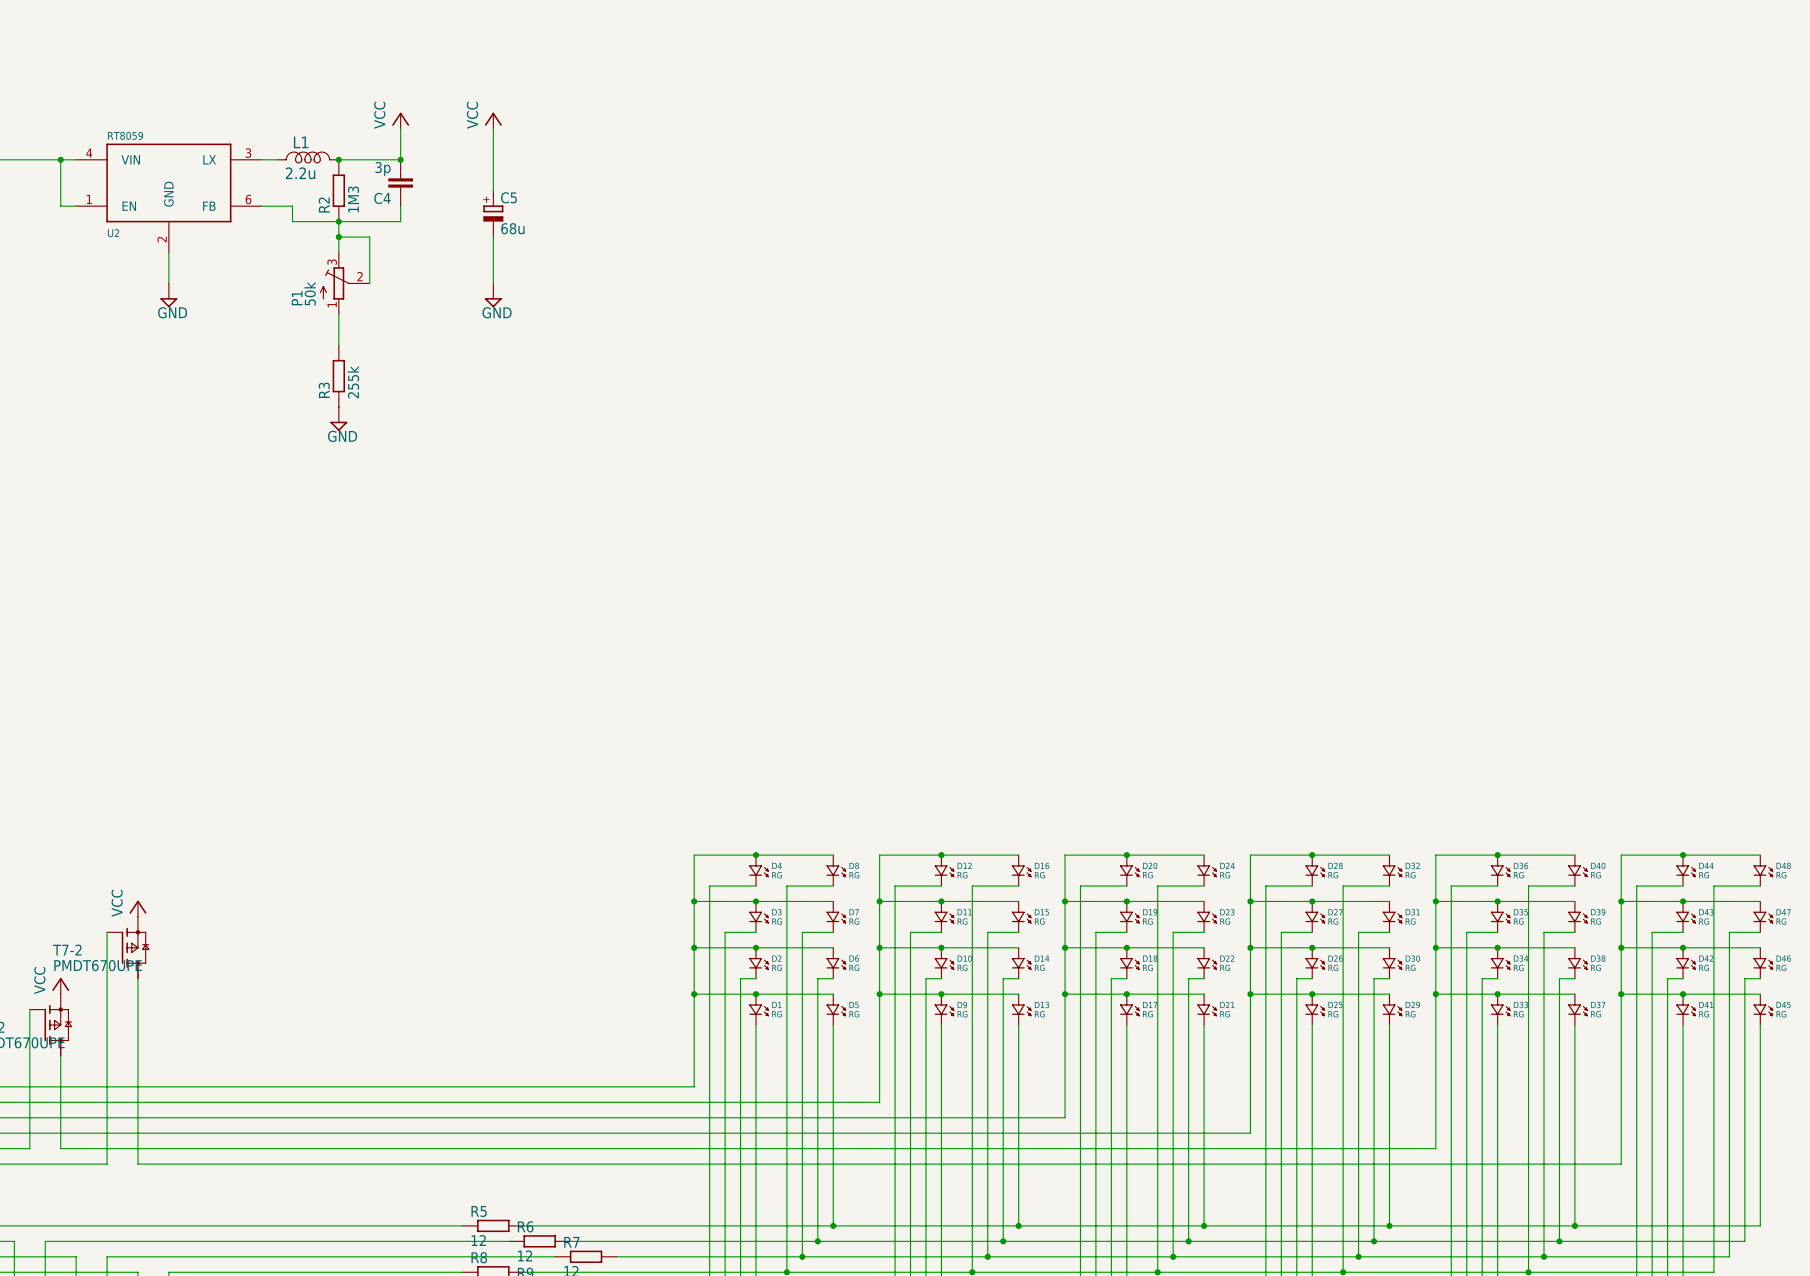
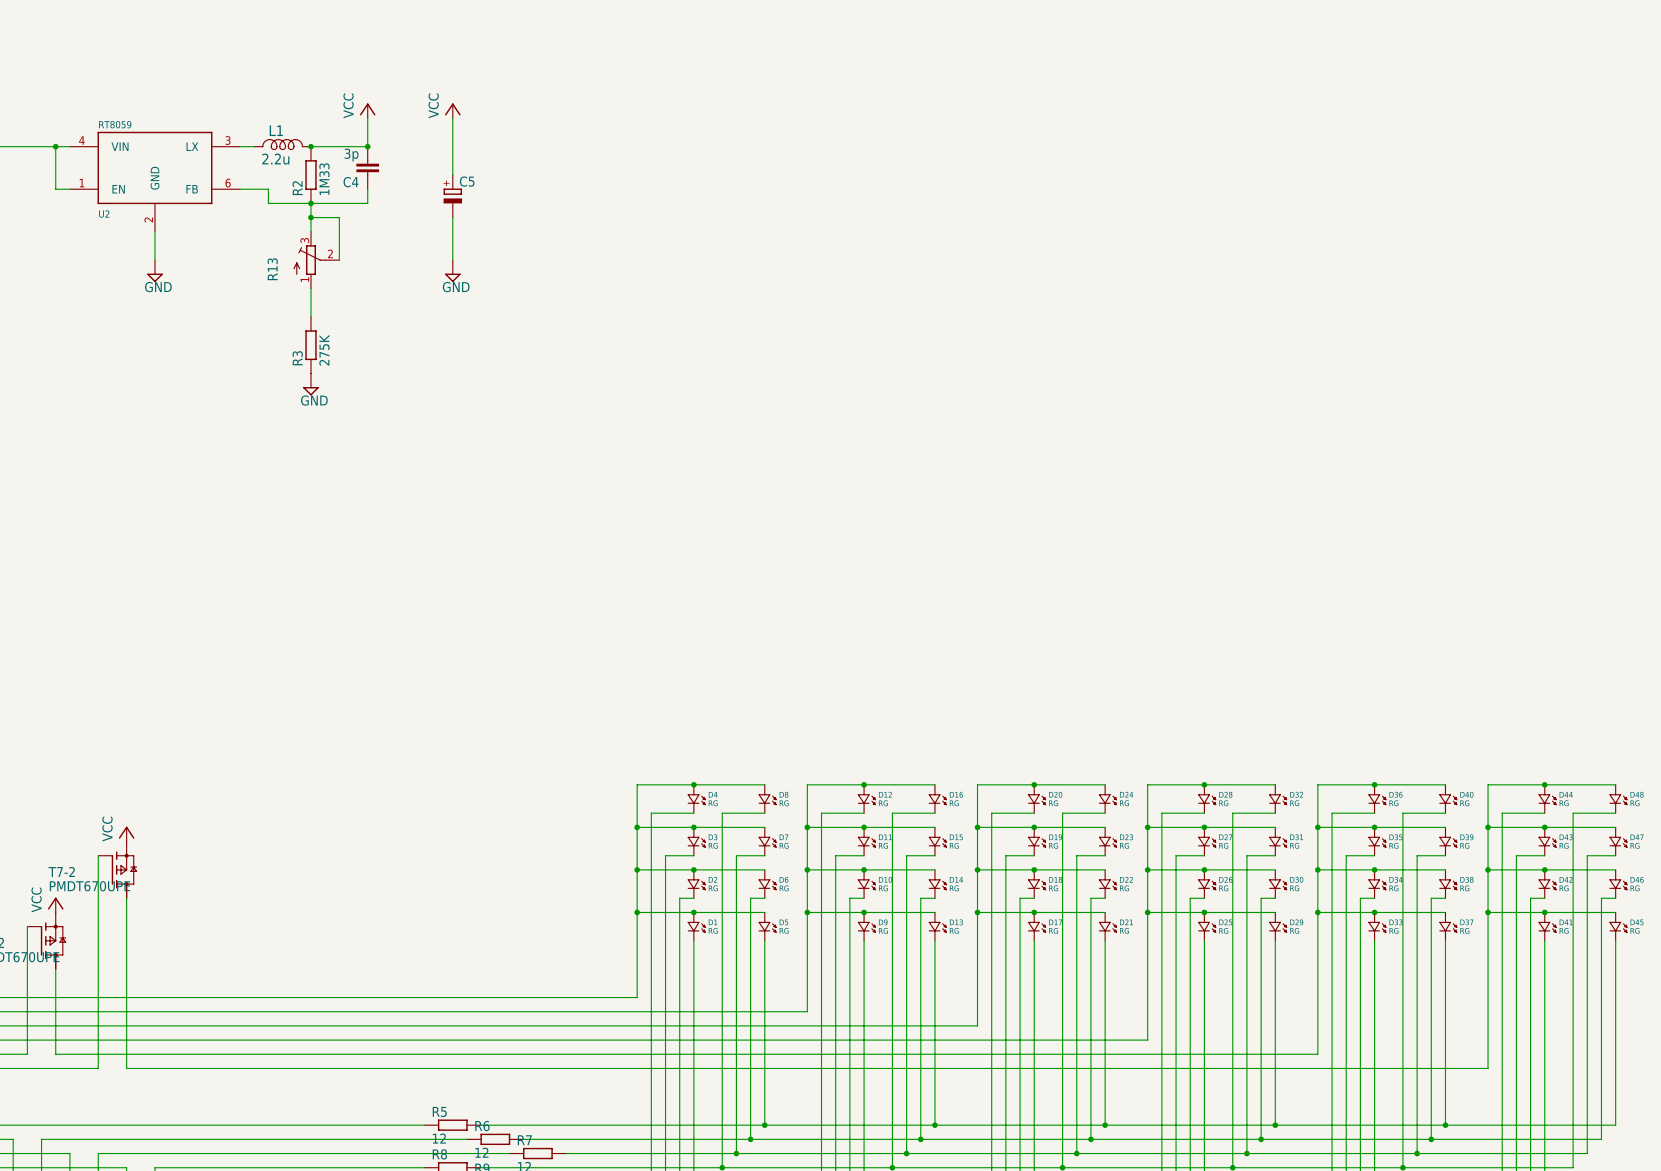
R2 value: 1M3 (353, 199) -> 1M33 (324, 179)
C5 value: 68u (512, 228) -> none
P1 value: 50k (310, 293) -> none
P1 name: P1 (297, 298) -> R13 (272, 269)
R3 value: 255k (353, 382) -> 275K (324, 350)

